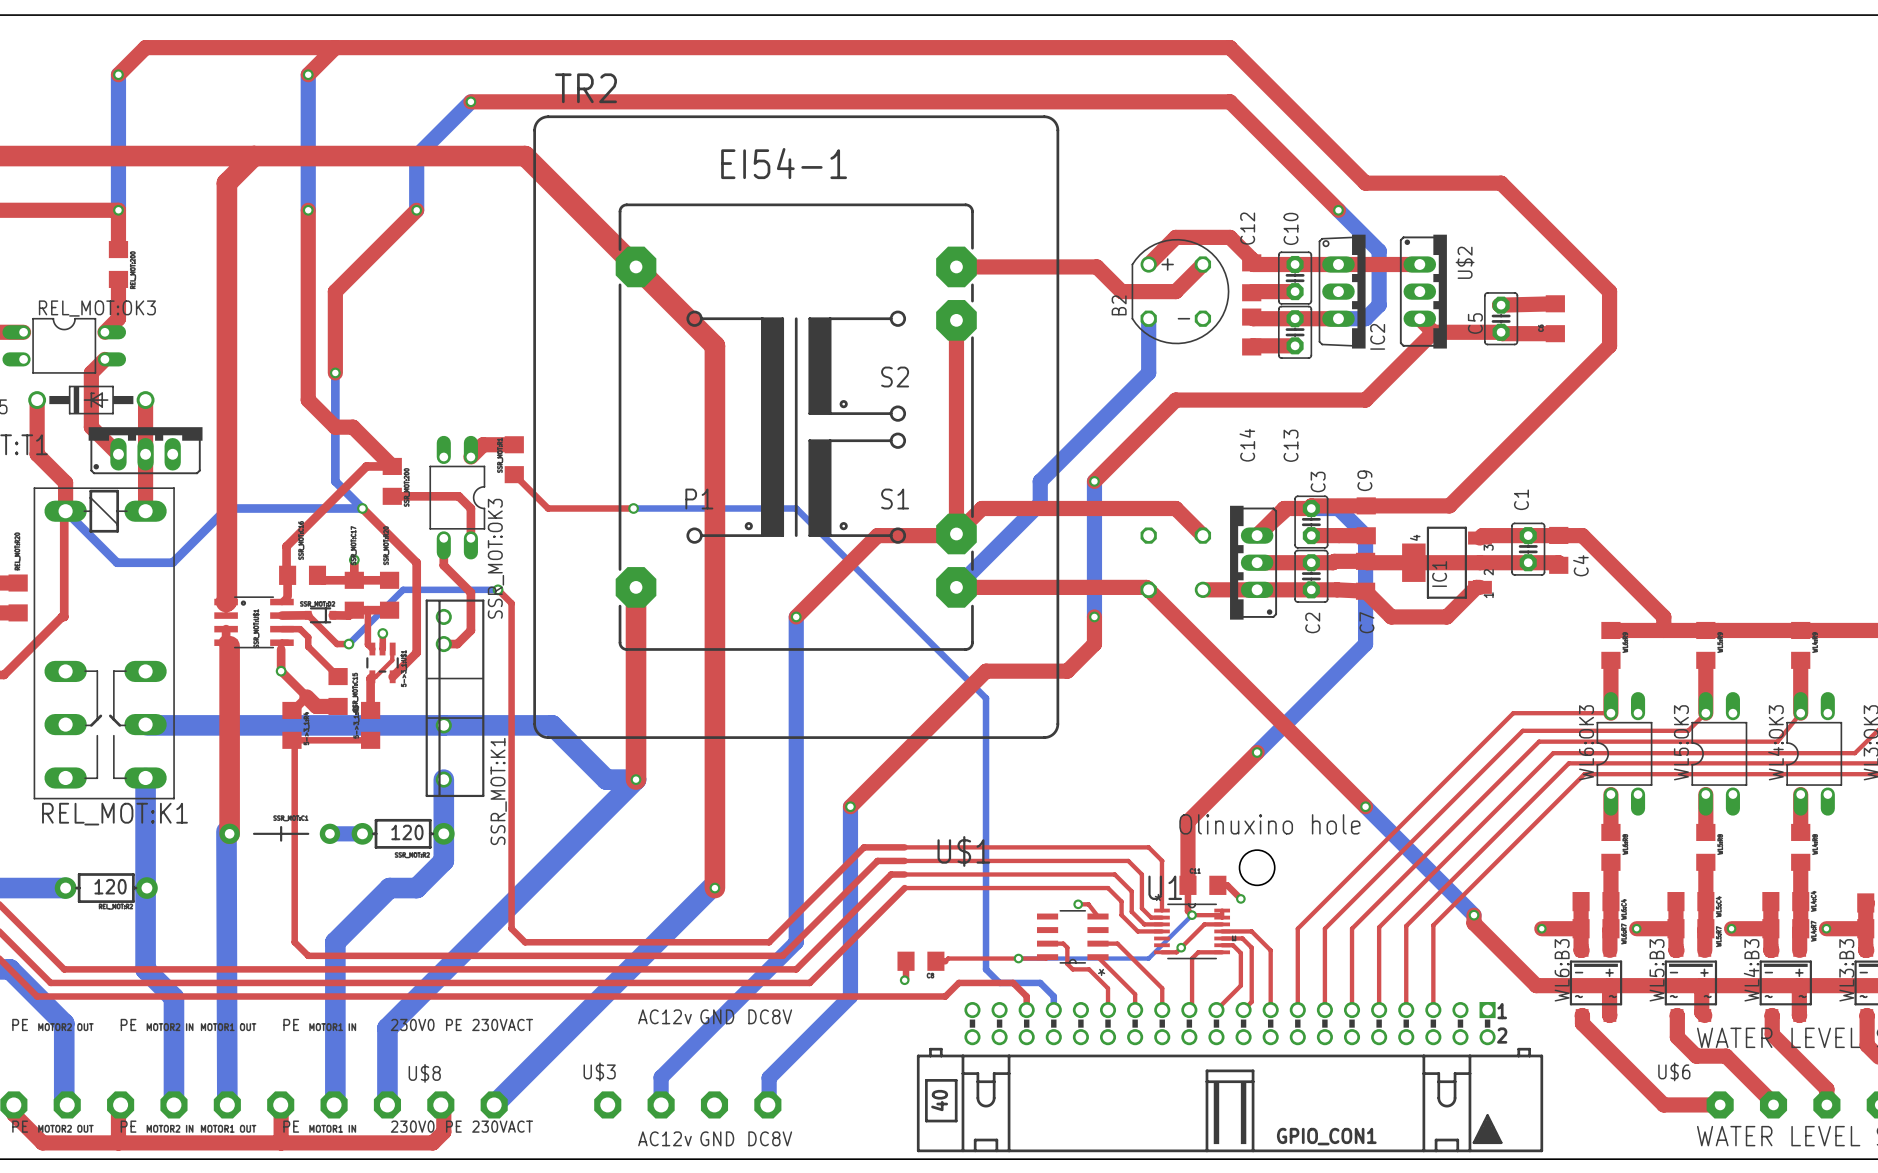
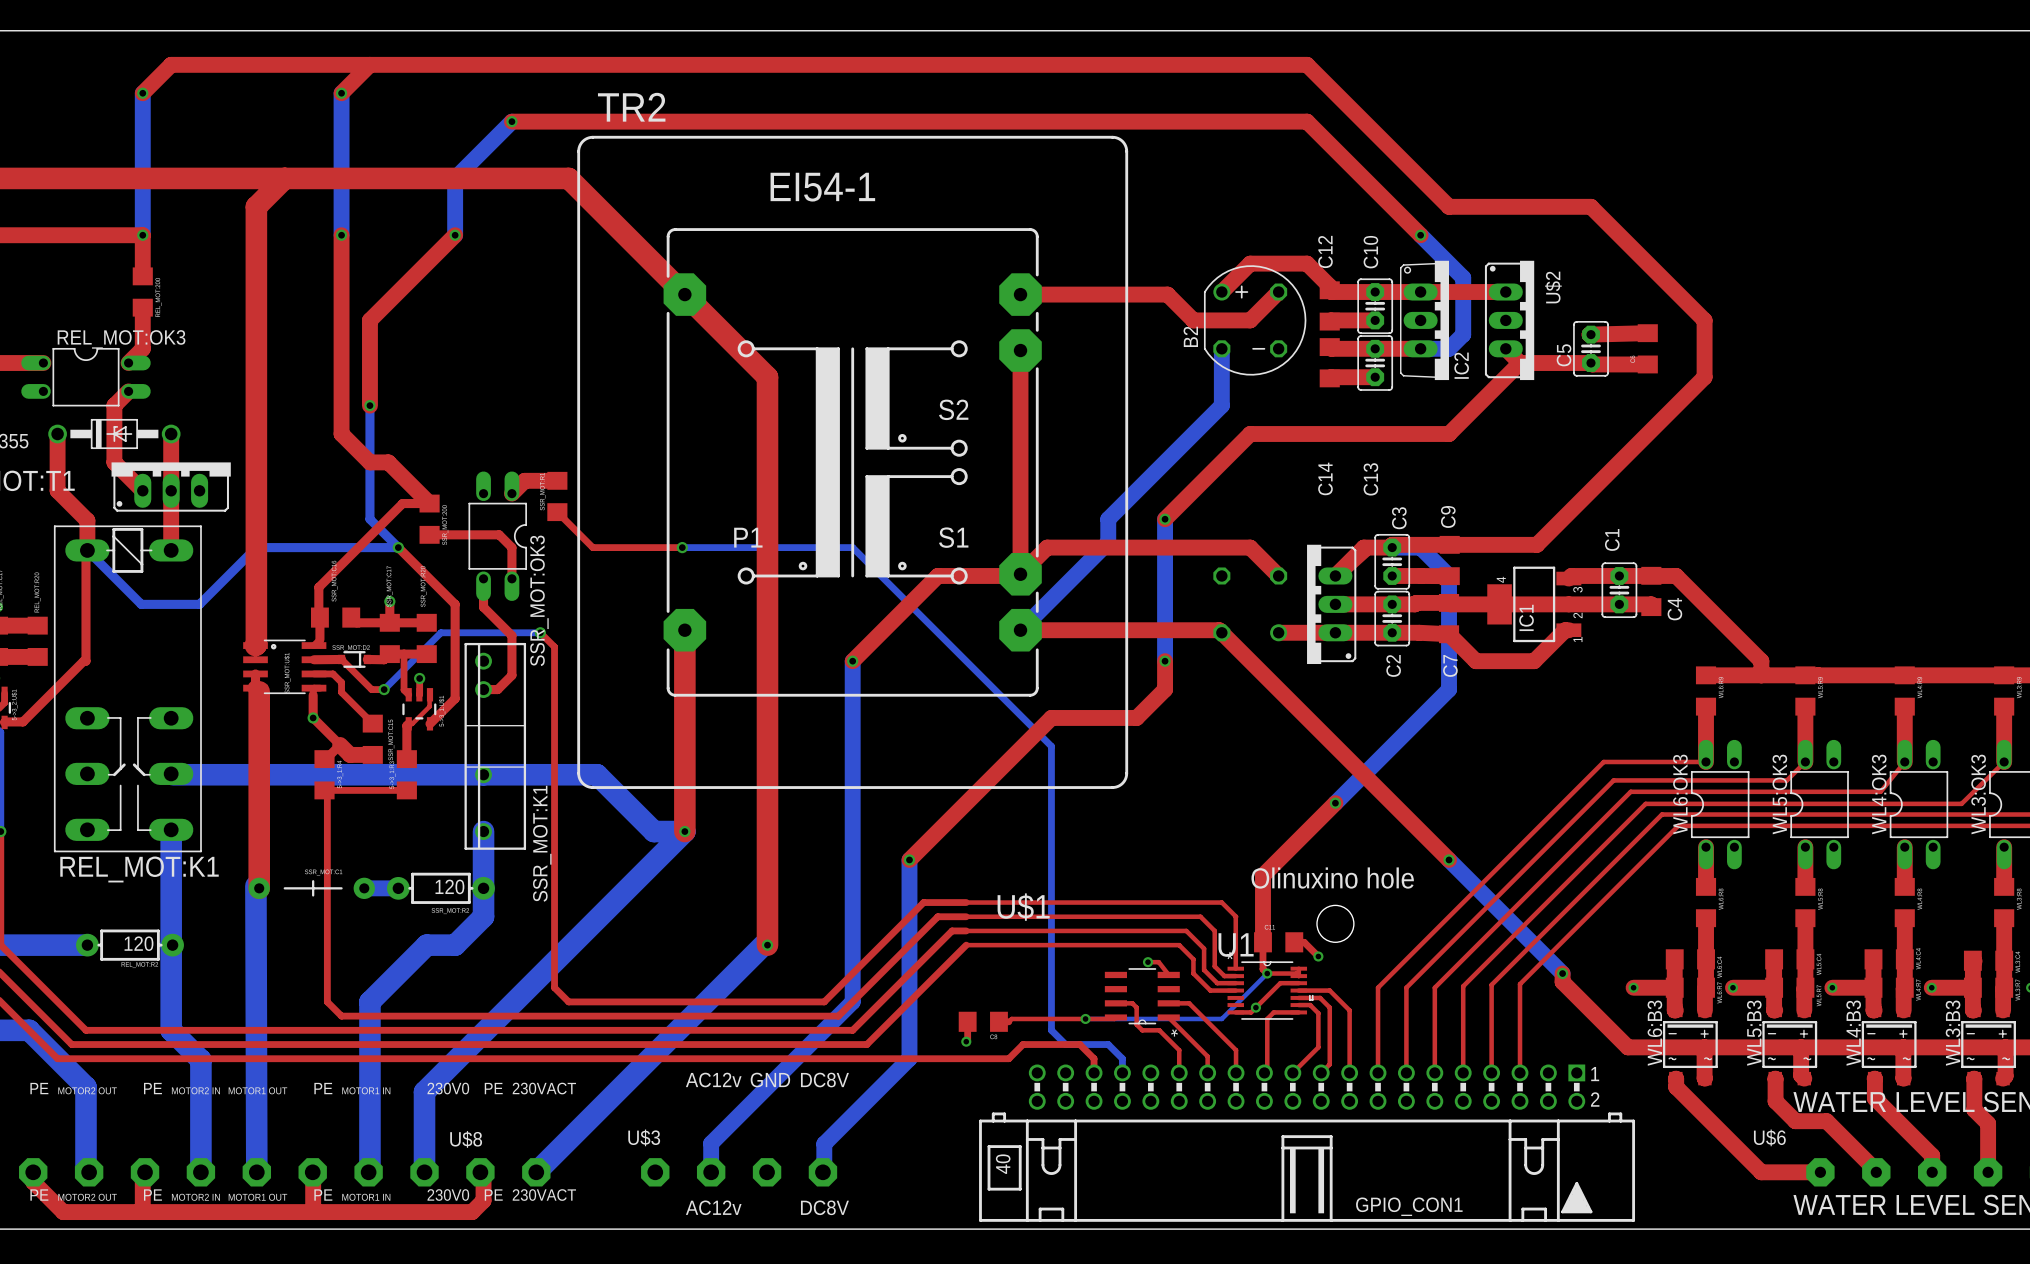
text: GND (717, 1138) -> none

